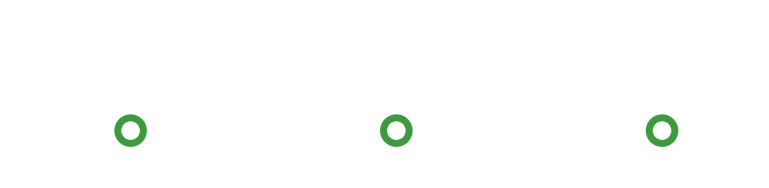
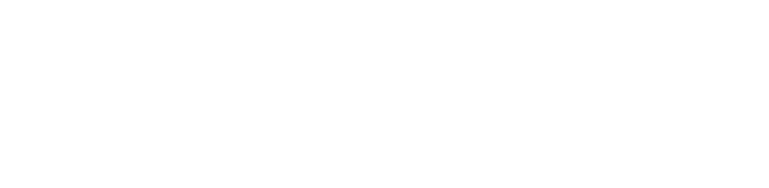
part: (130, 130) -> none
part: (396, 130) -> none
part: (662, 130) -> none

